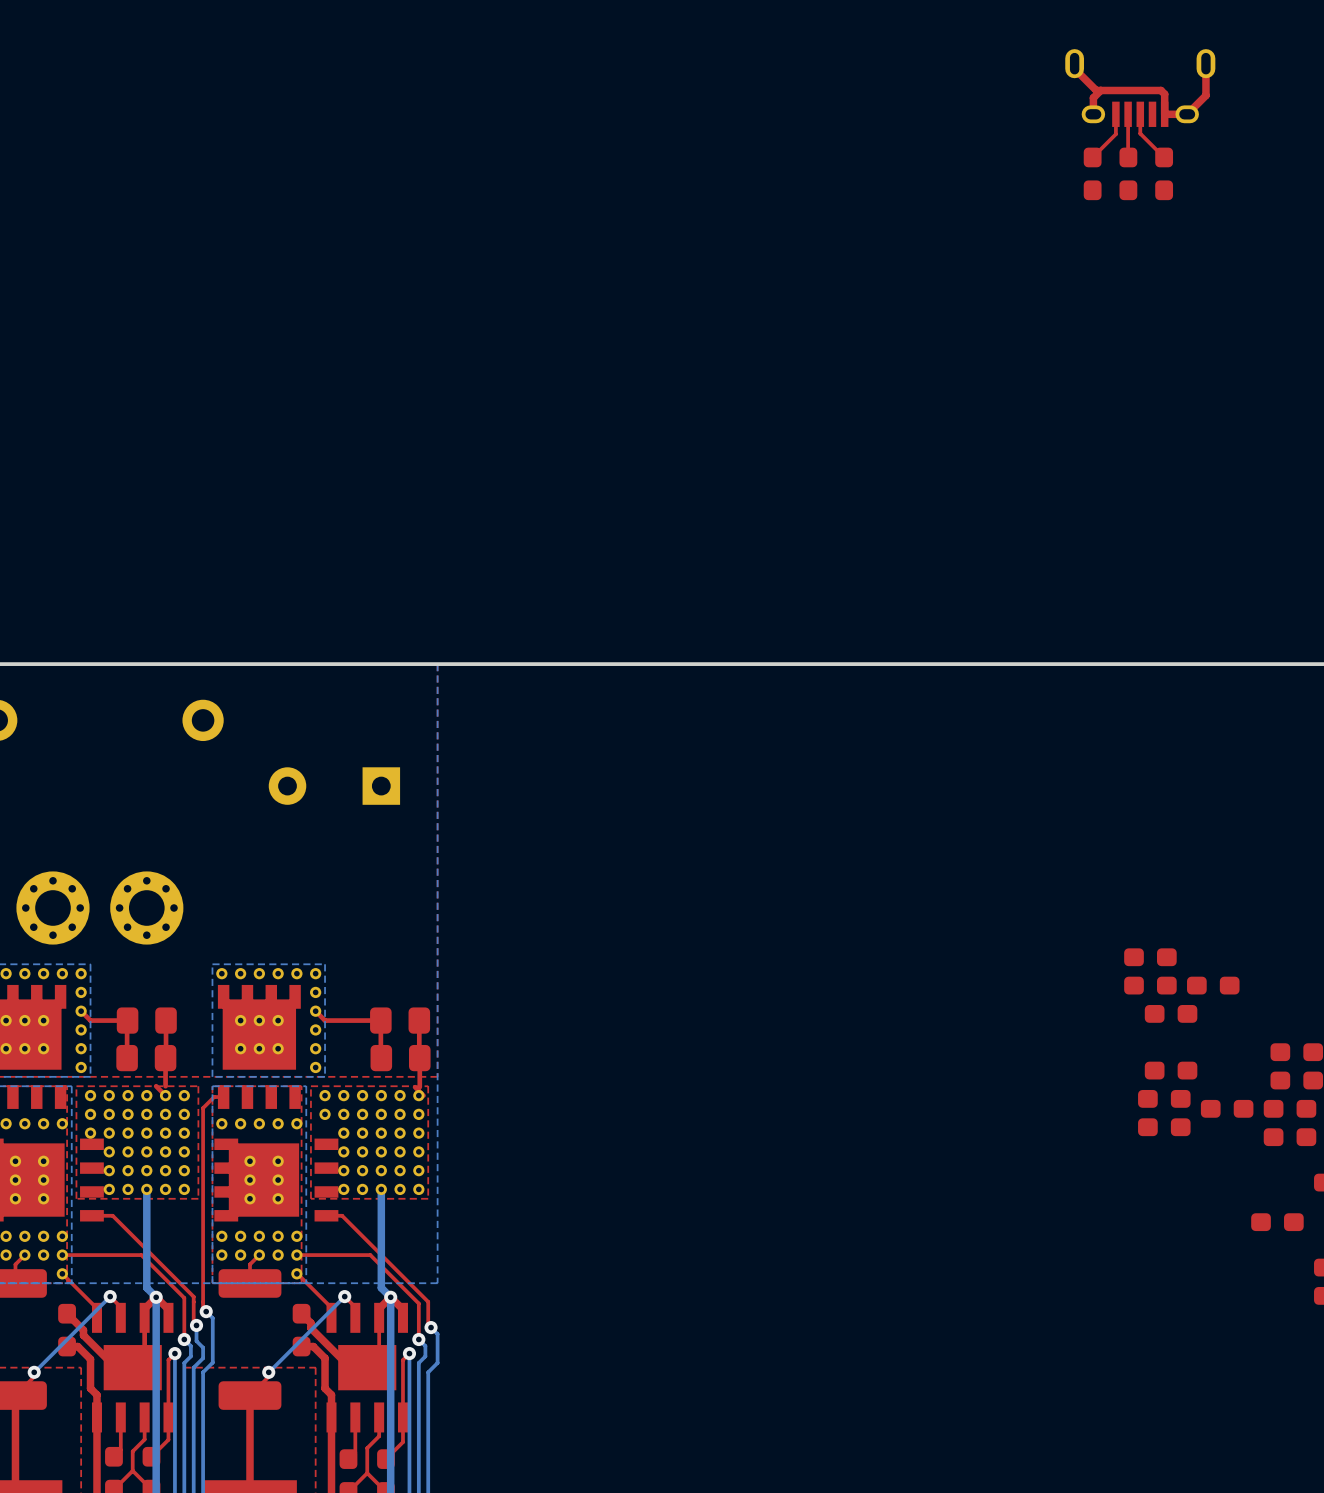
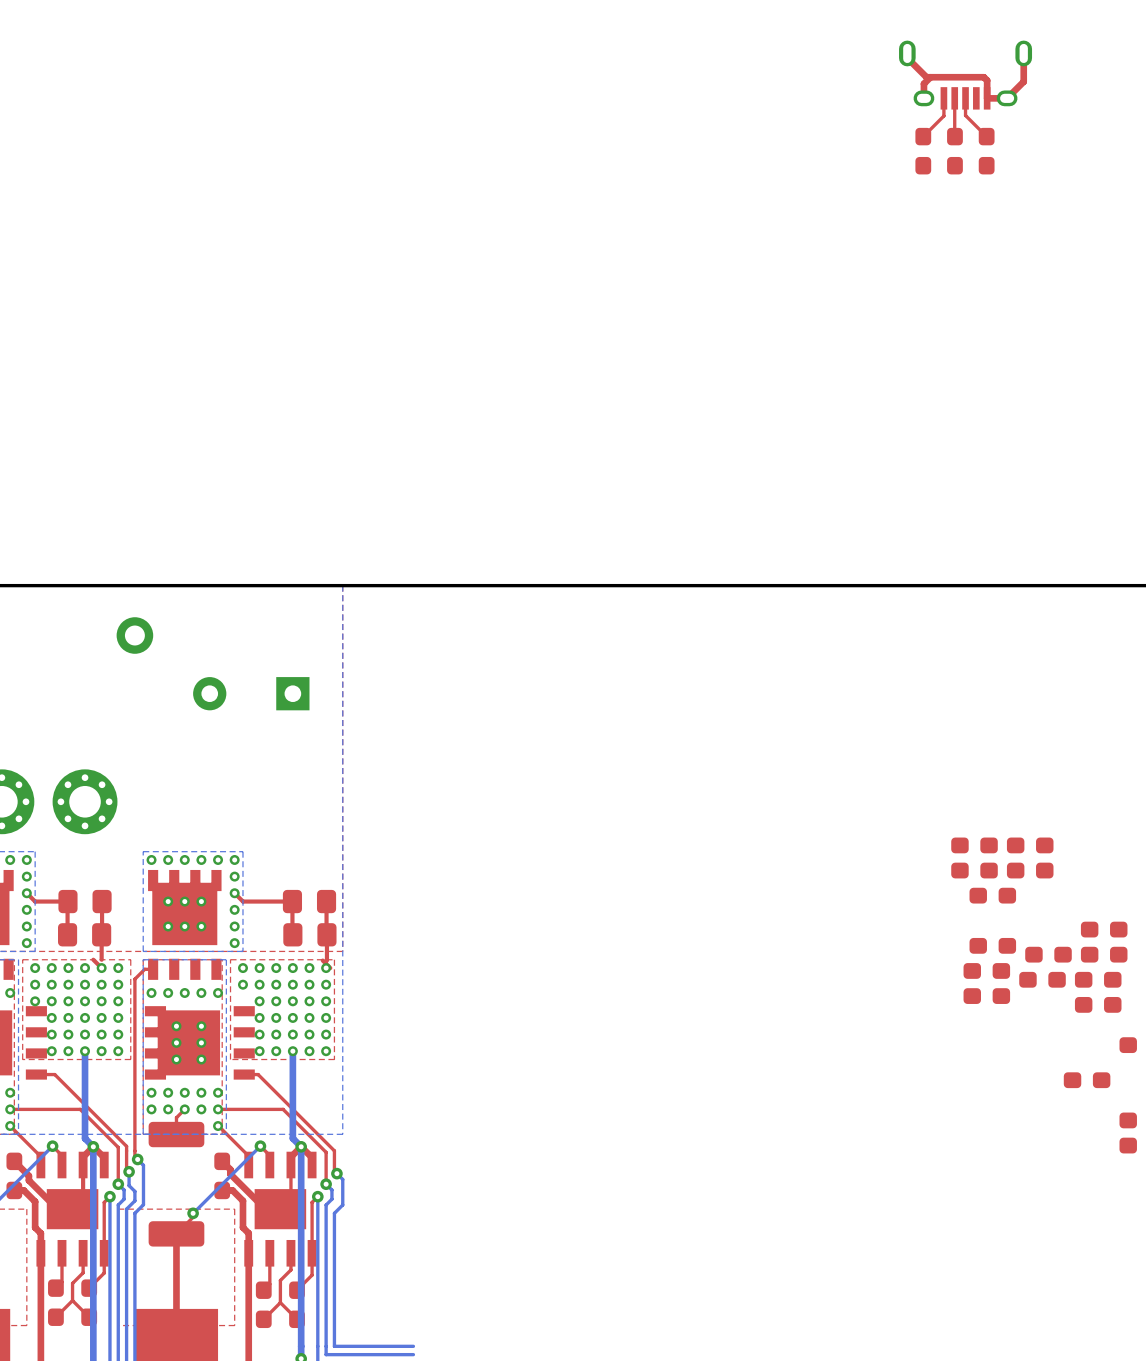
part: none -> (1030, 845)
part: none -> (1048, 954)

